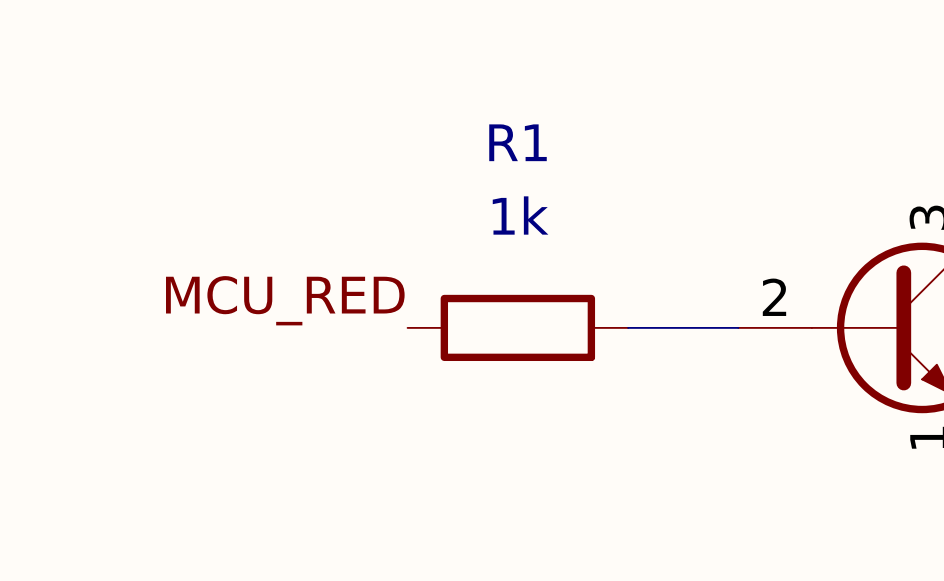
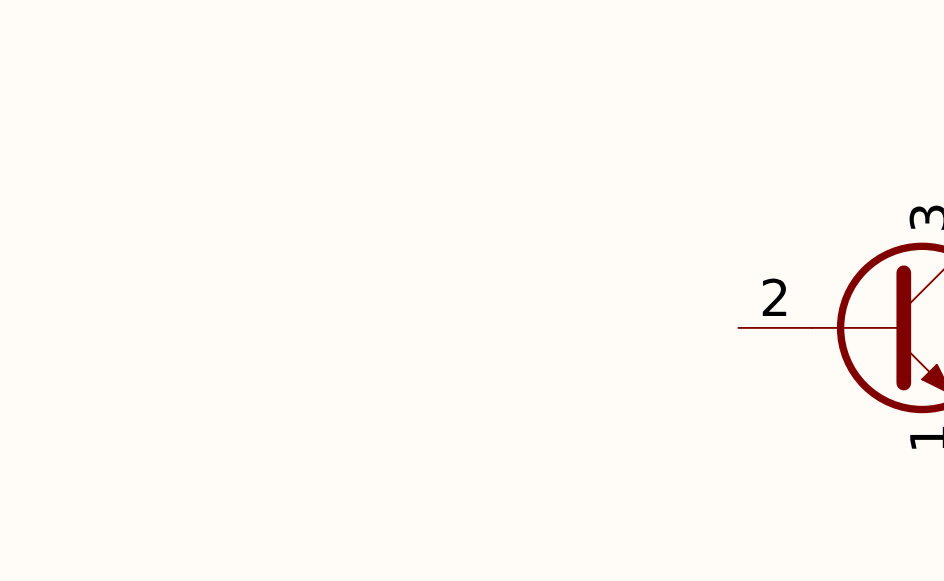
label: MCU_RED (285, 300) -> none
R1: 1k (517, 327) -> none
wire: (628, 327) (738, 327) -> none

